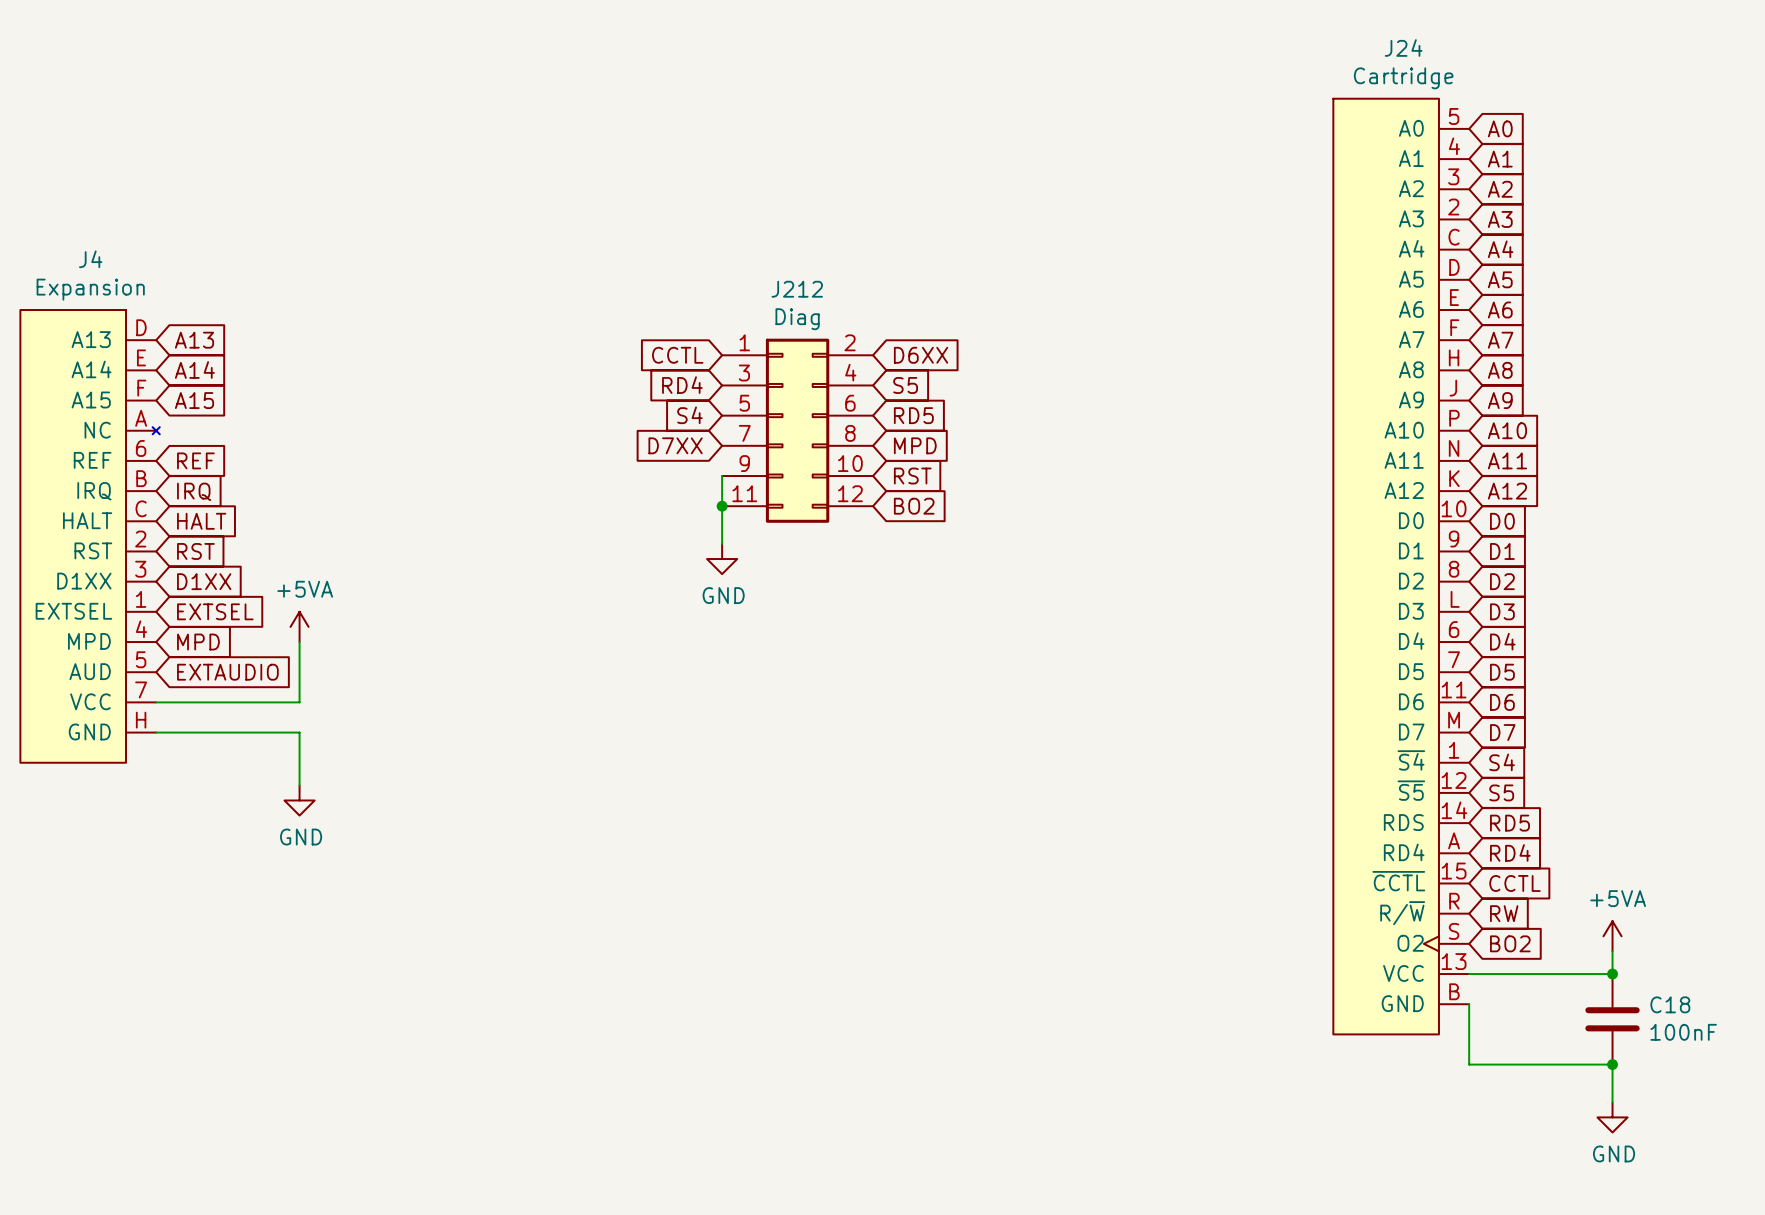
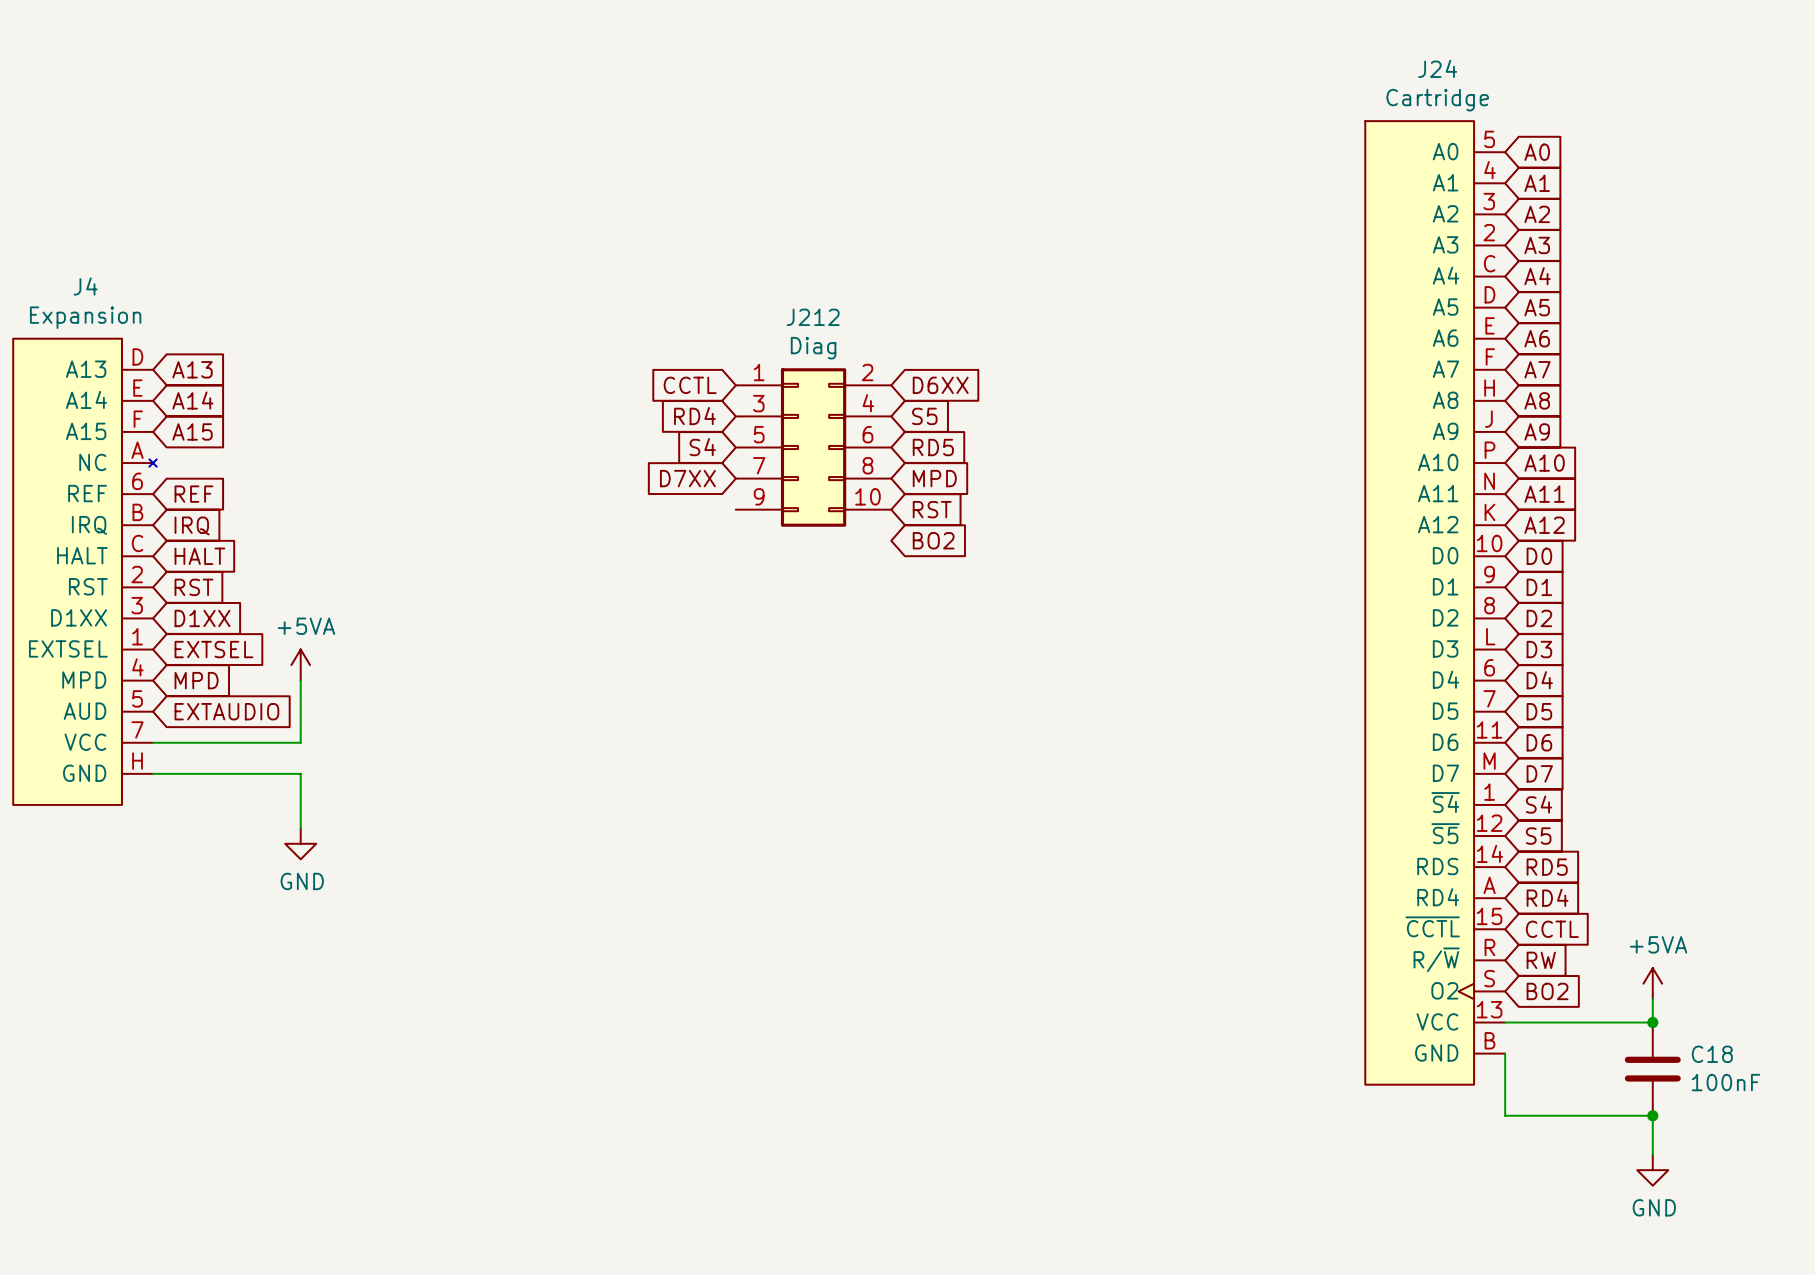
J212 symbol: [722, 338, 874, 523] -> [735, 368, 892, 527]
wire: (722, 476) (722, 543) -> none
junction: (722, 506) -> none
power symbol: GND (722, 559) -> none

